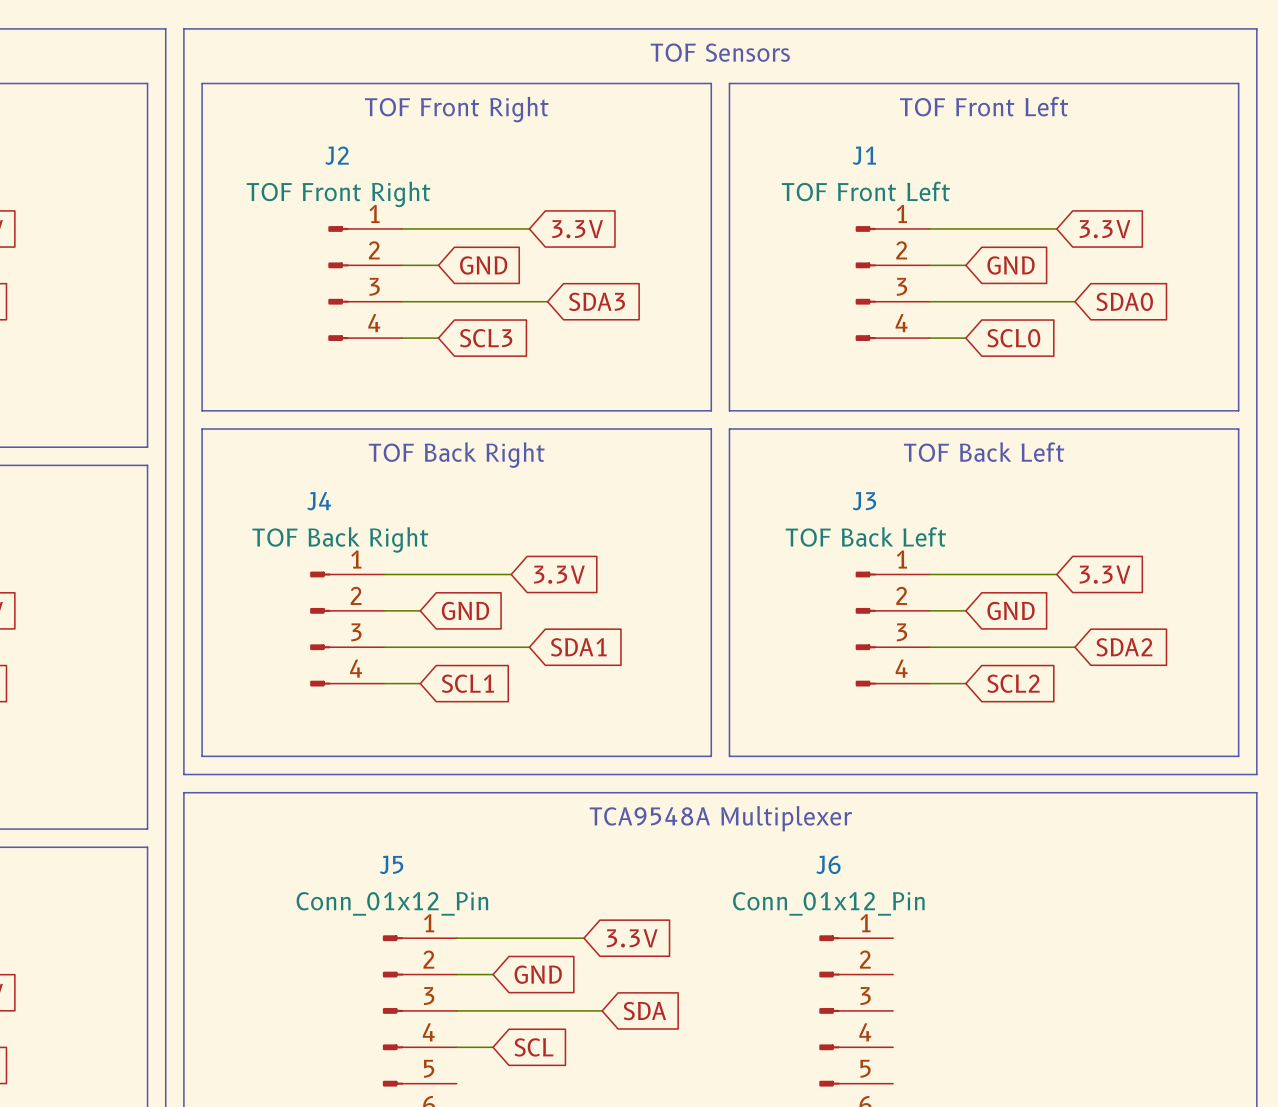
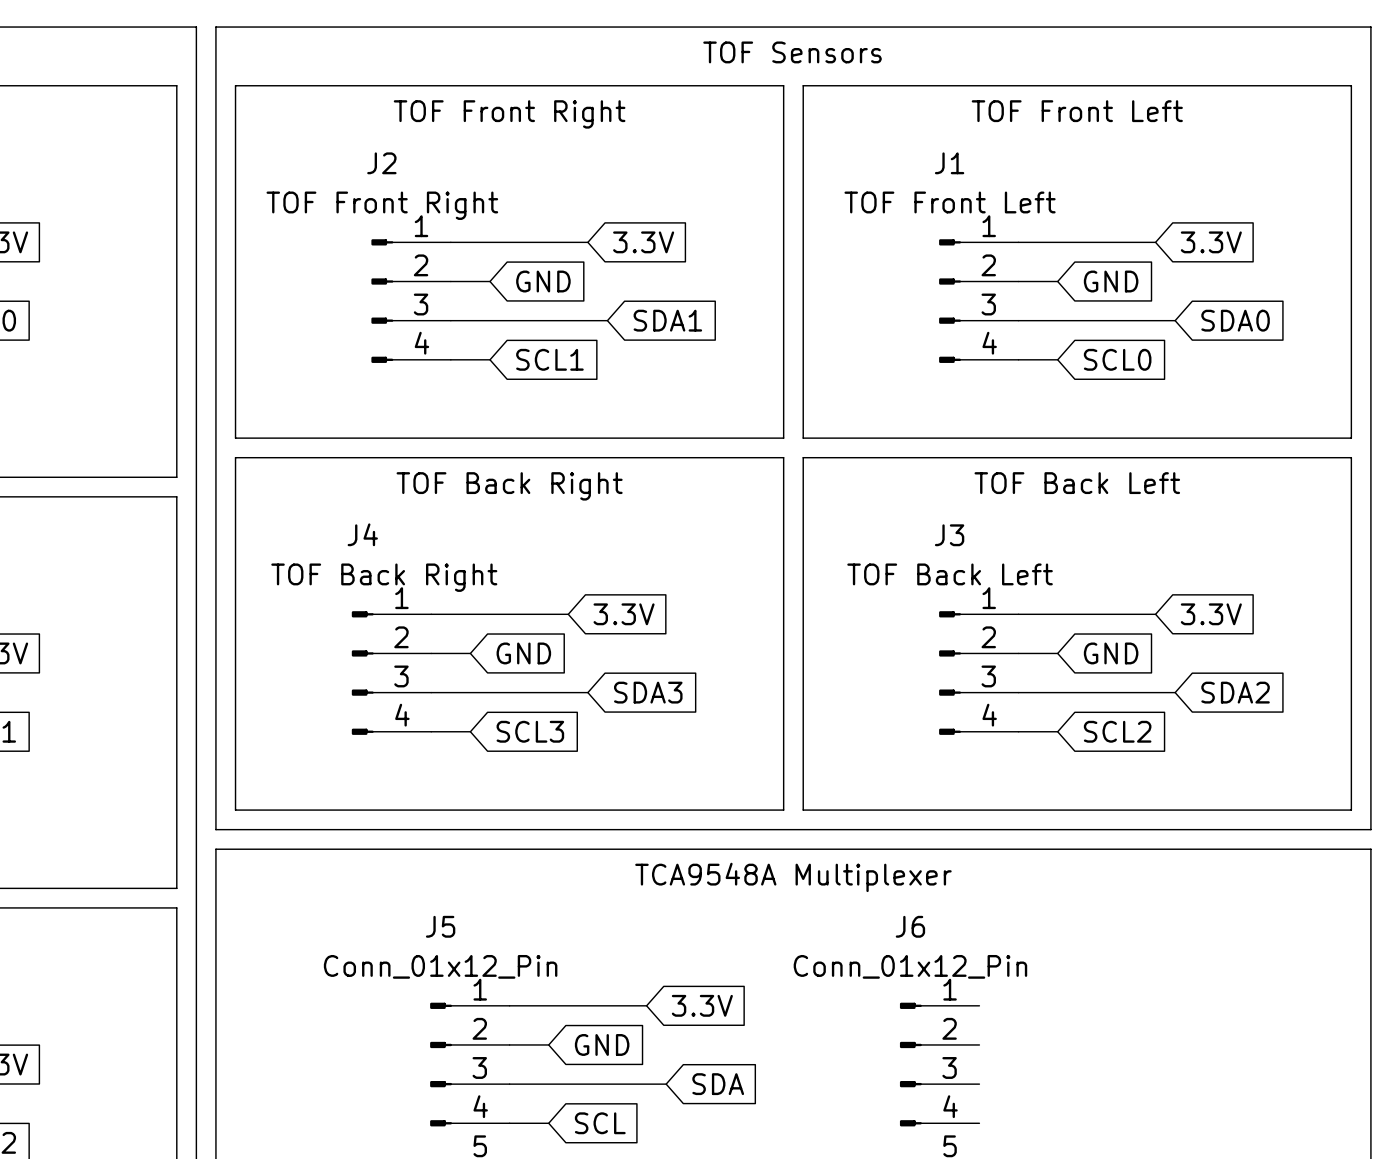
global label: SDA3 (597, 301) -> SDA1 (667, 320)
global label: SCL3 (486, 338) -> SCL1 (549, 359)
global label: SDA1 (578, 647) -> SDA3 (648, 692)
global label: SCL1 (467, 683) -> SCL3 (530, 731)

